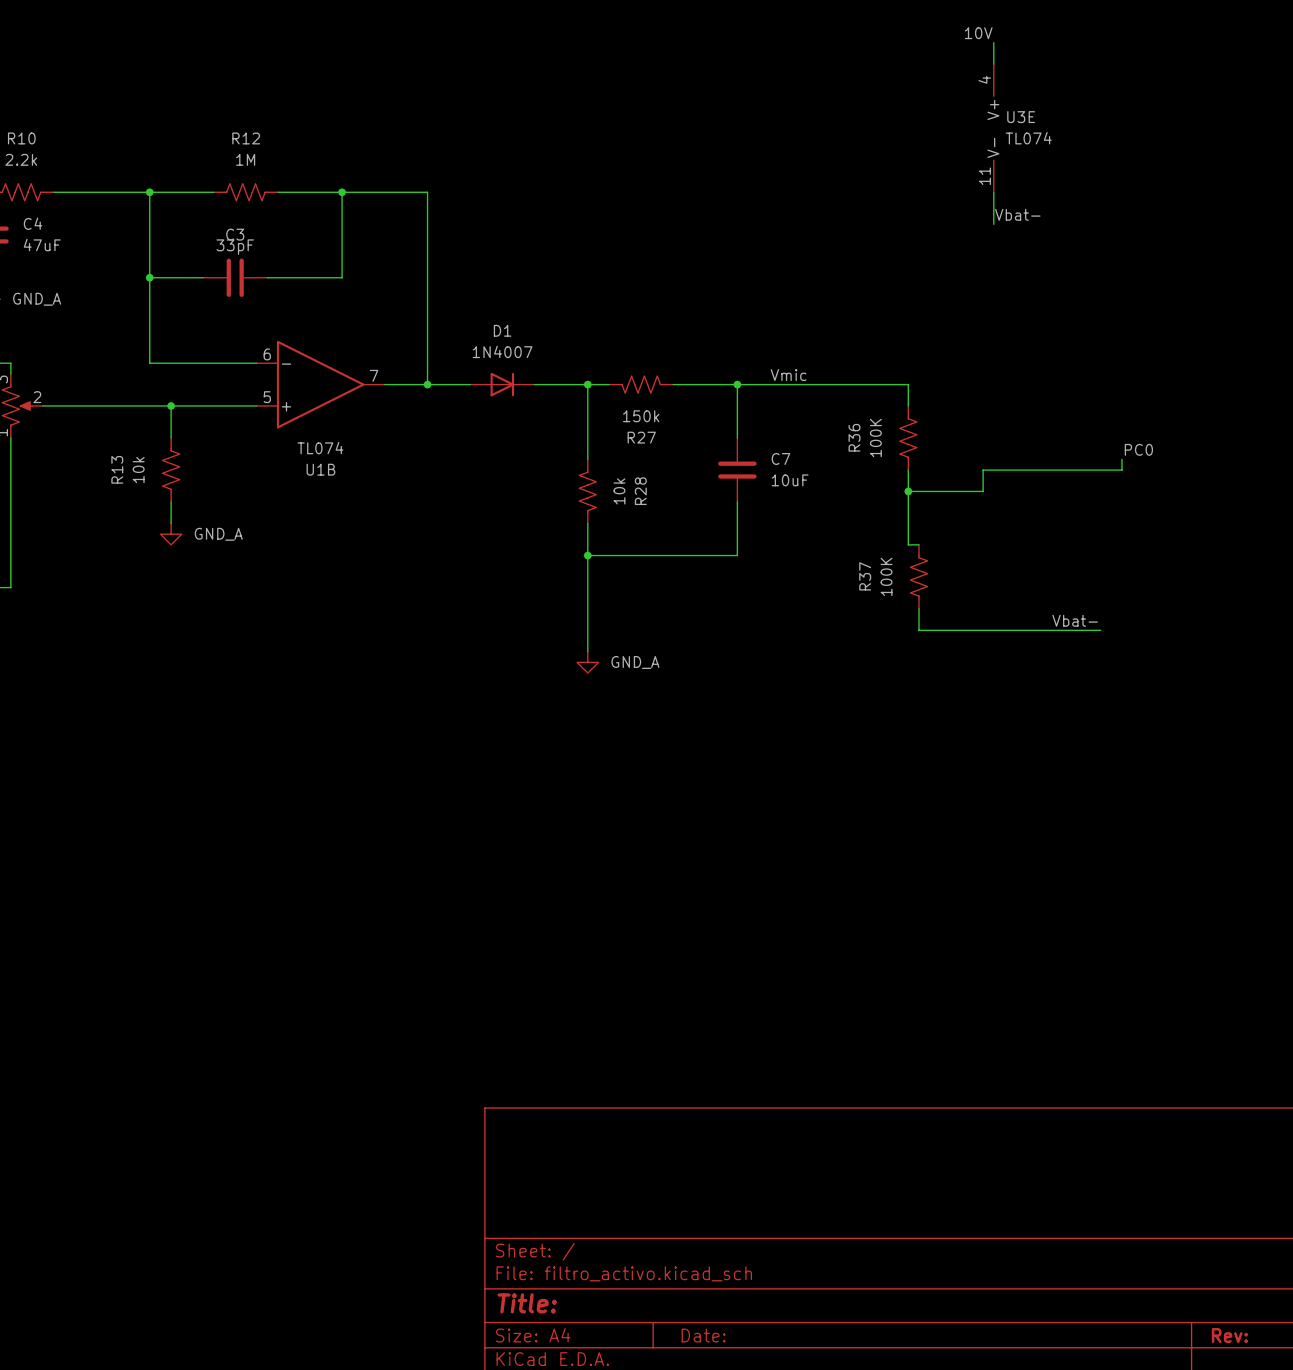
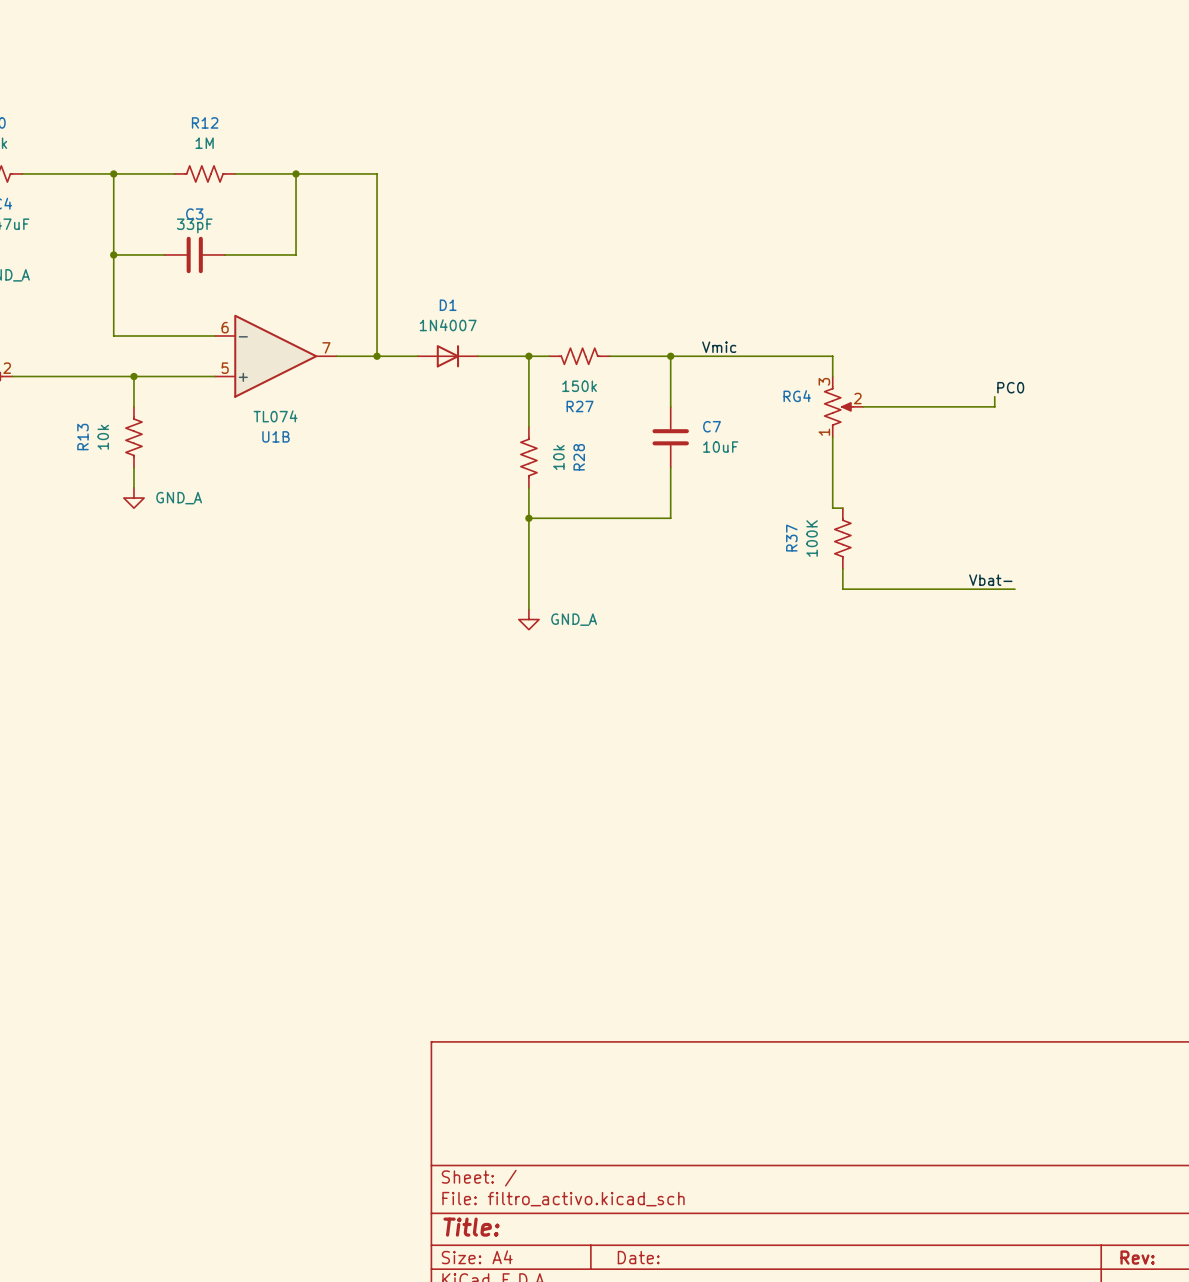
label: 10V (978, 33) -> none
wire: (993, 42) (993, 64) -> none
U3E: TL074 (993, 128) -> none
wire: (993, 192) (993, 224) -> none
label: Vbat- (1017, 214) -> none
wire: none -> (994, 396) (994, 406) (863, 406)
R36: 100K (908, 438) -> none
RG4: none -> (843, 406)
label position: PC0 (1138, 449) -> PC0 (1010, 387)
wire: (1122, 459) (1122, 470) (983, 470) (983, 491) (908, 491) -> none
junction: (908, 491) -> none

